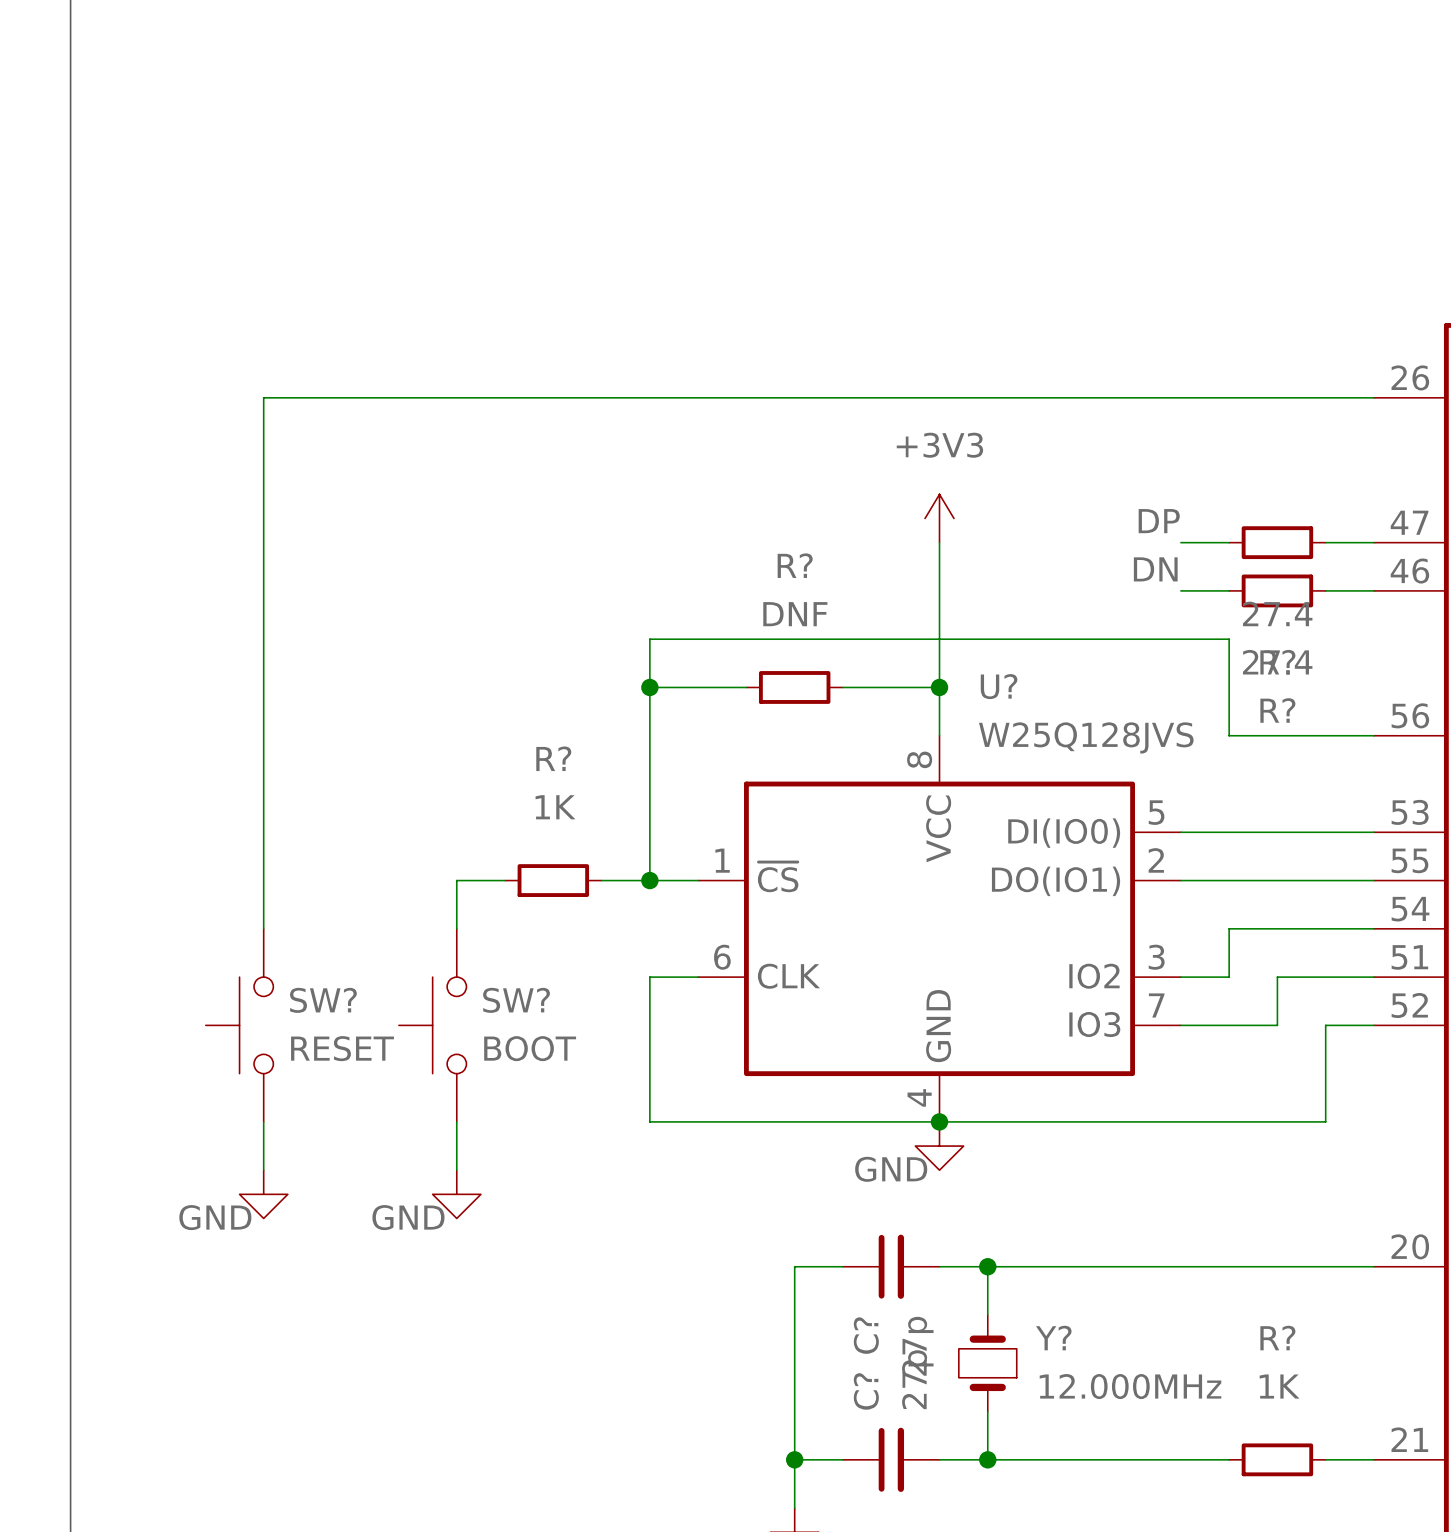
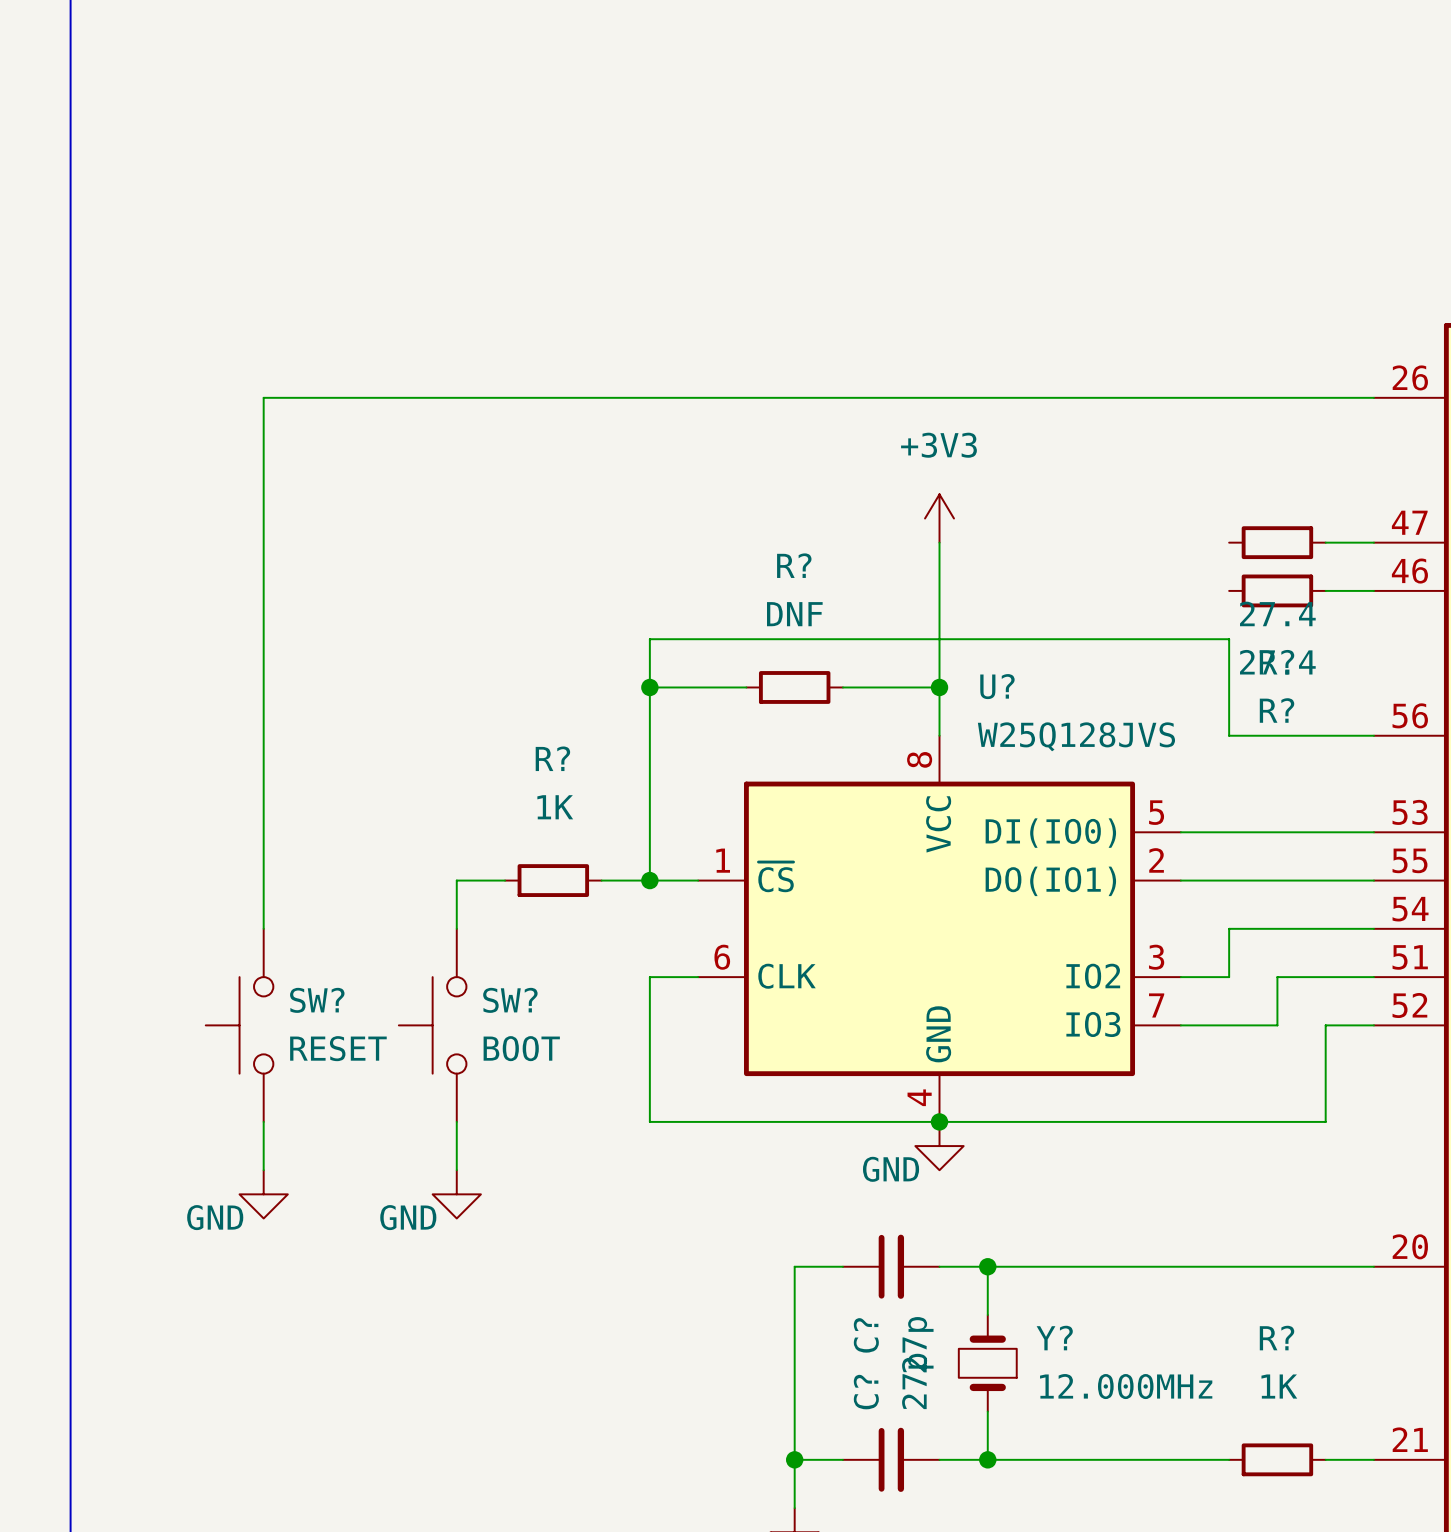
label: DP (1159, 521) -> none
wire: (1180, 542) (1229, 542) -> none
label: DN (1155, 569) -> none
wire: (1180, 590) (1229, 590) -> none

